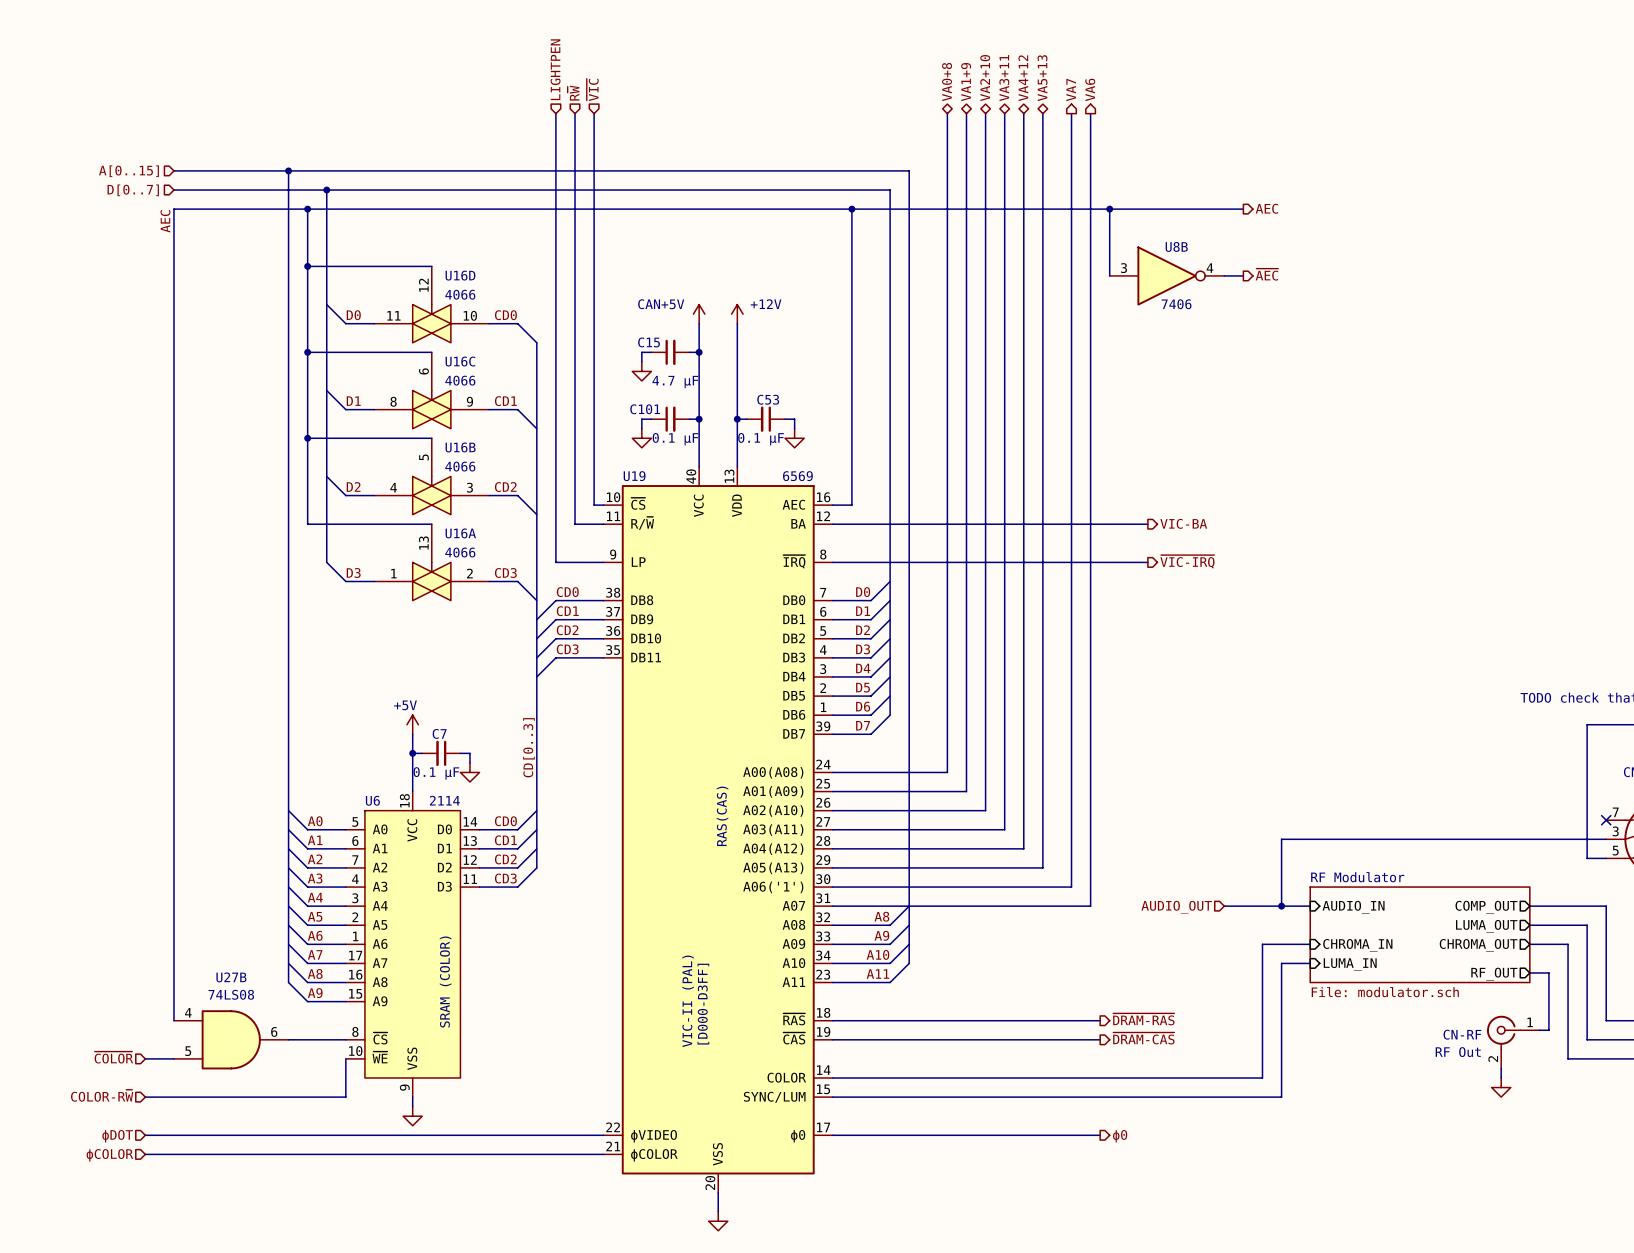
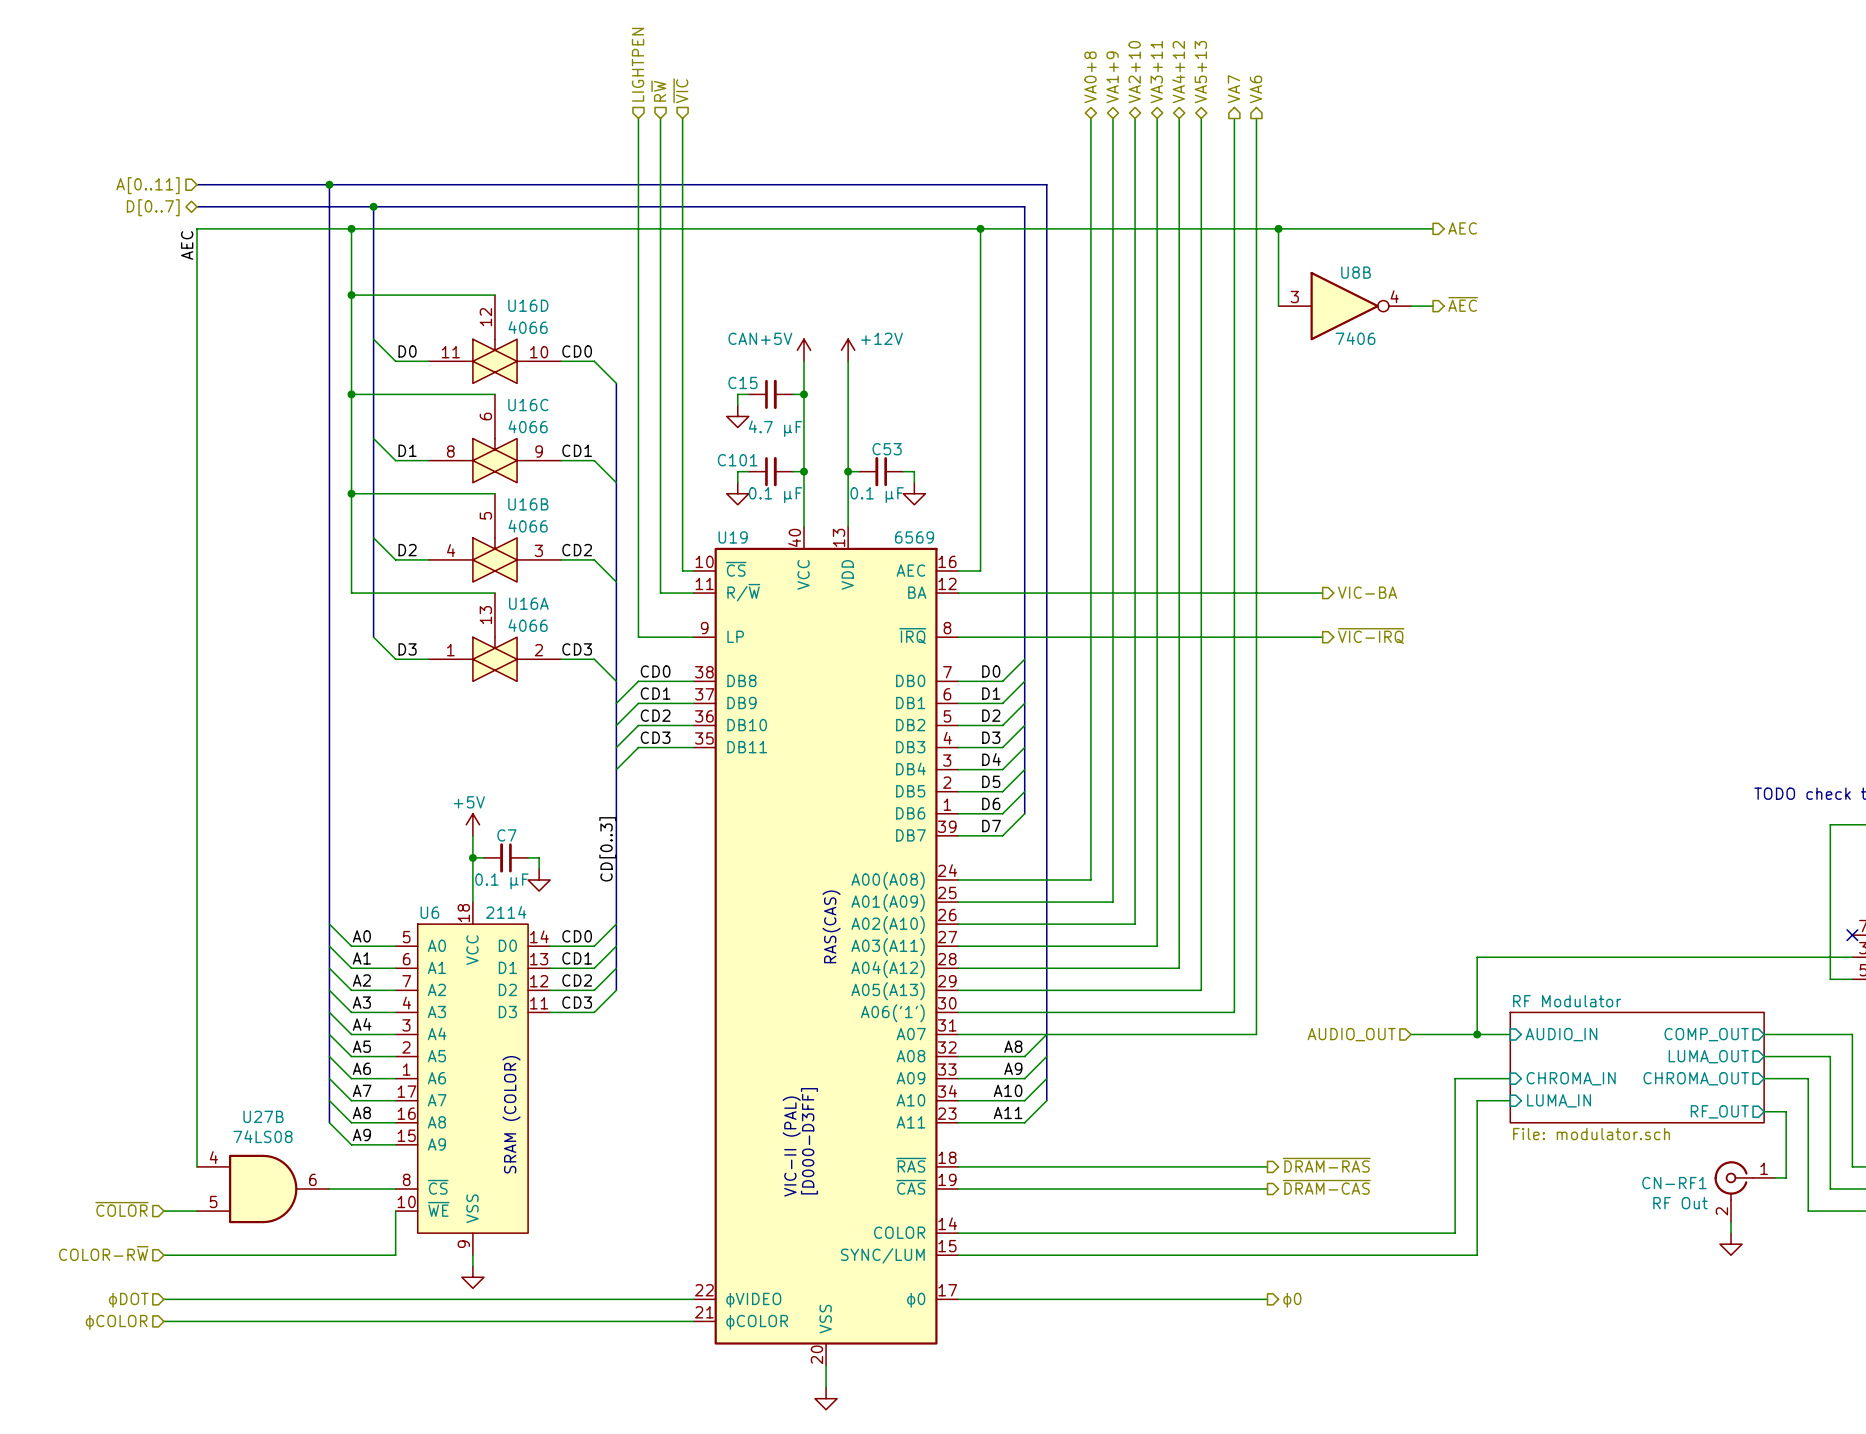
hierarchical label: A[0..15] (128, 171) -> A[0..11] (147, 185)
hierarchical label shape: input (133, 190) -> bidirectional (153, 207)
CN-RF name: CN-RF (1462, 1034) -> CN-RF1 (1674, 1183)

